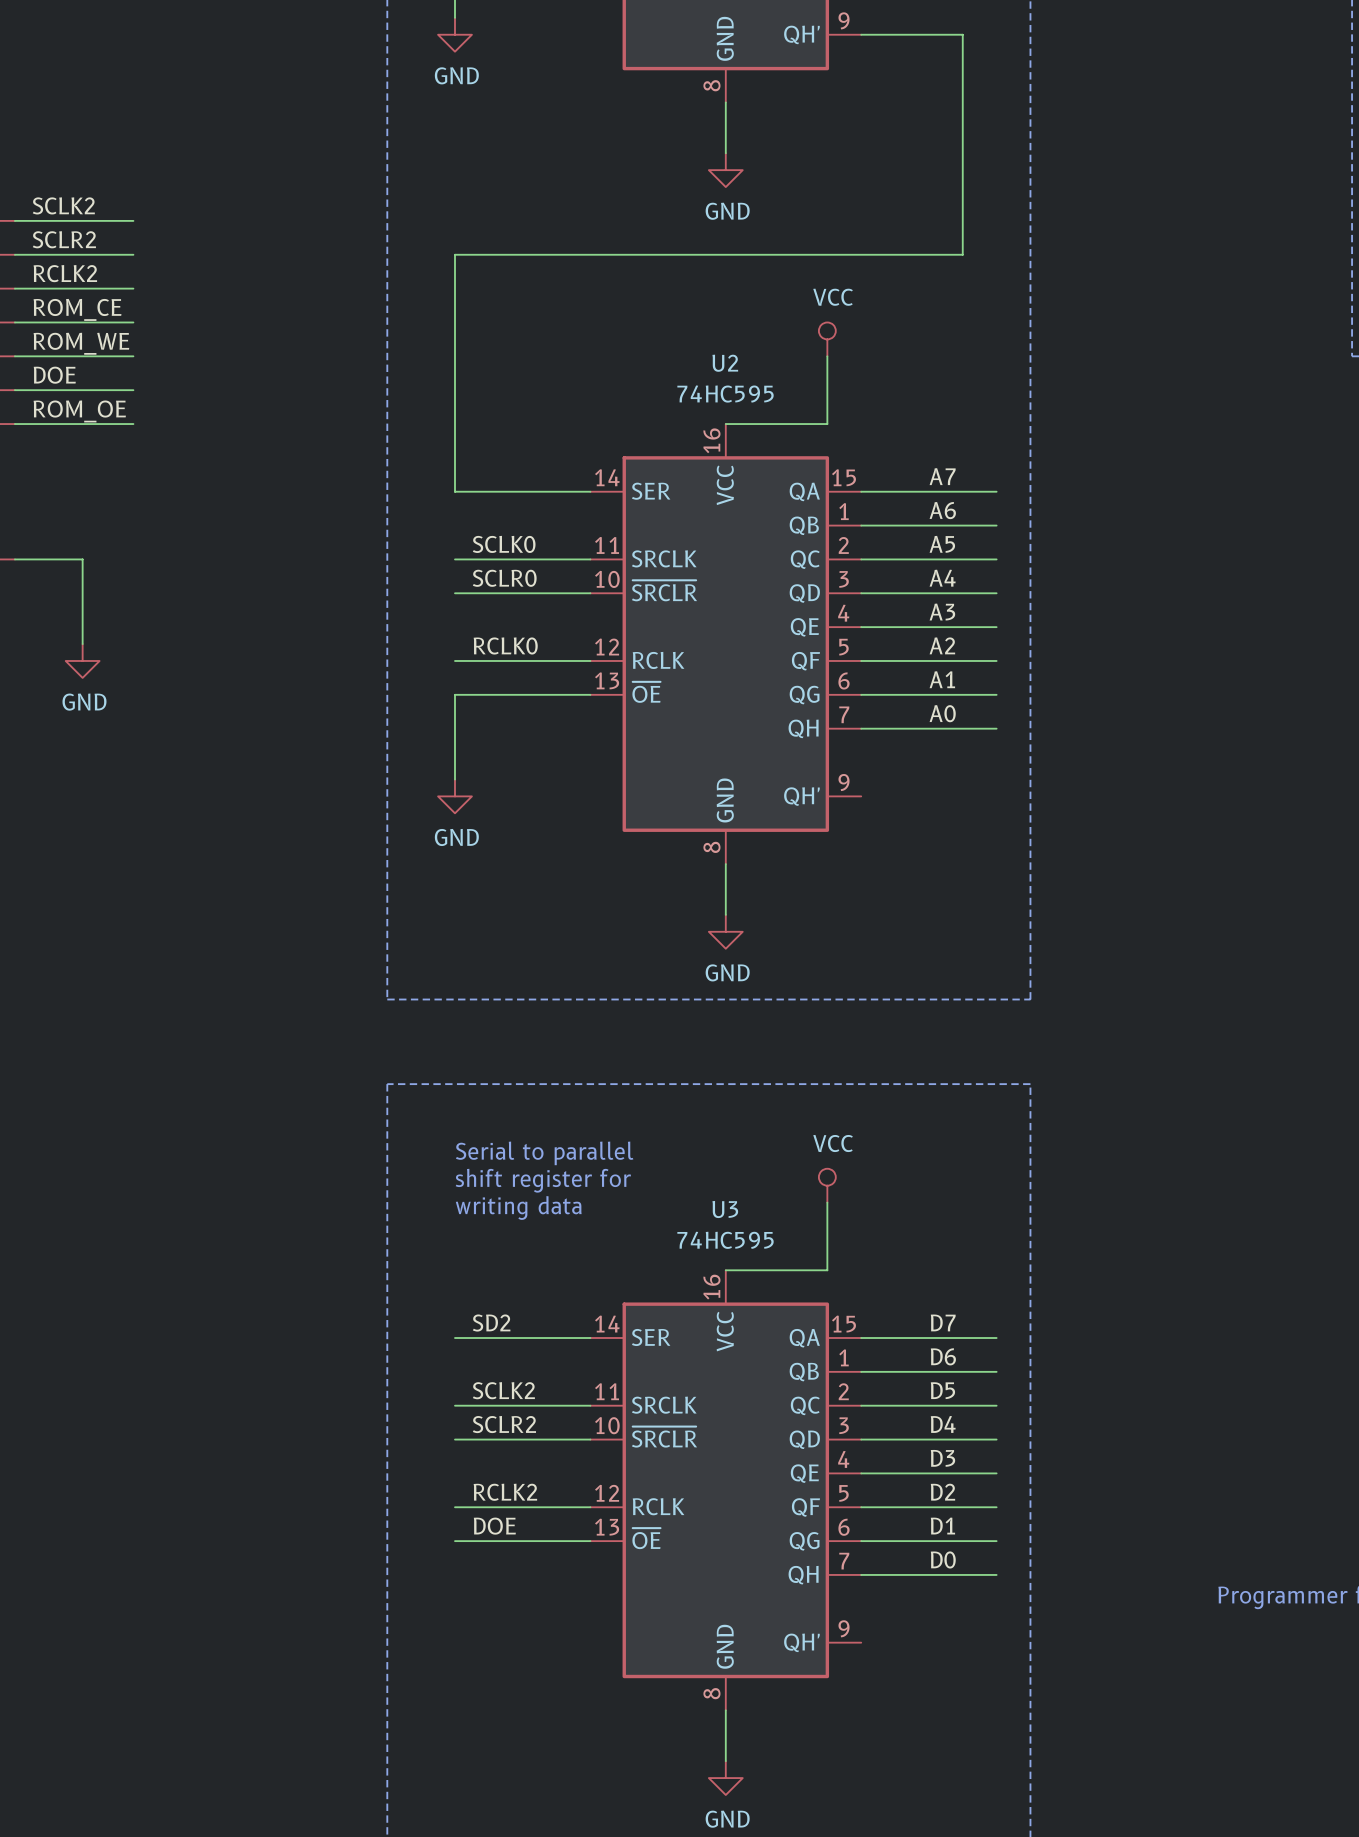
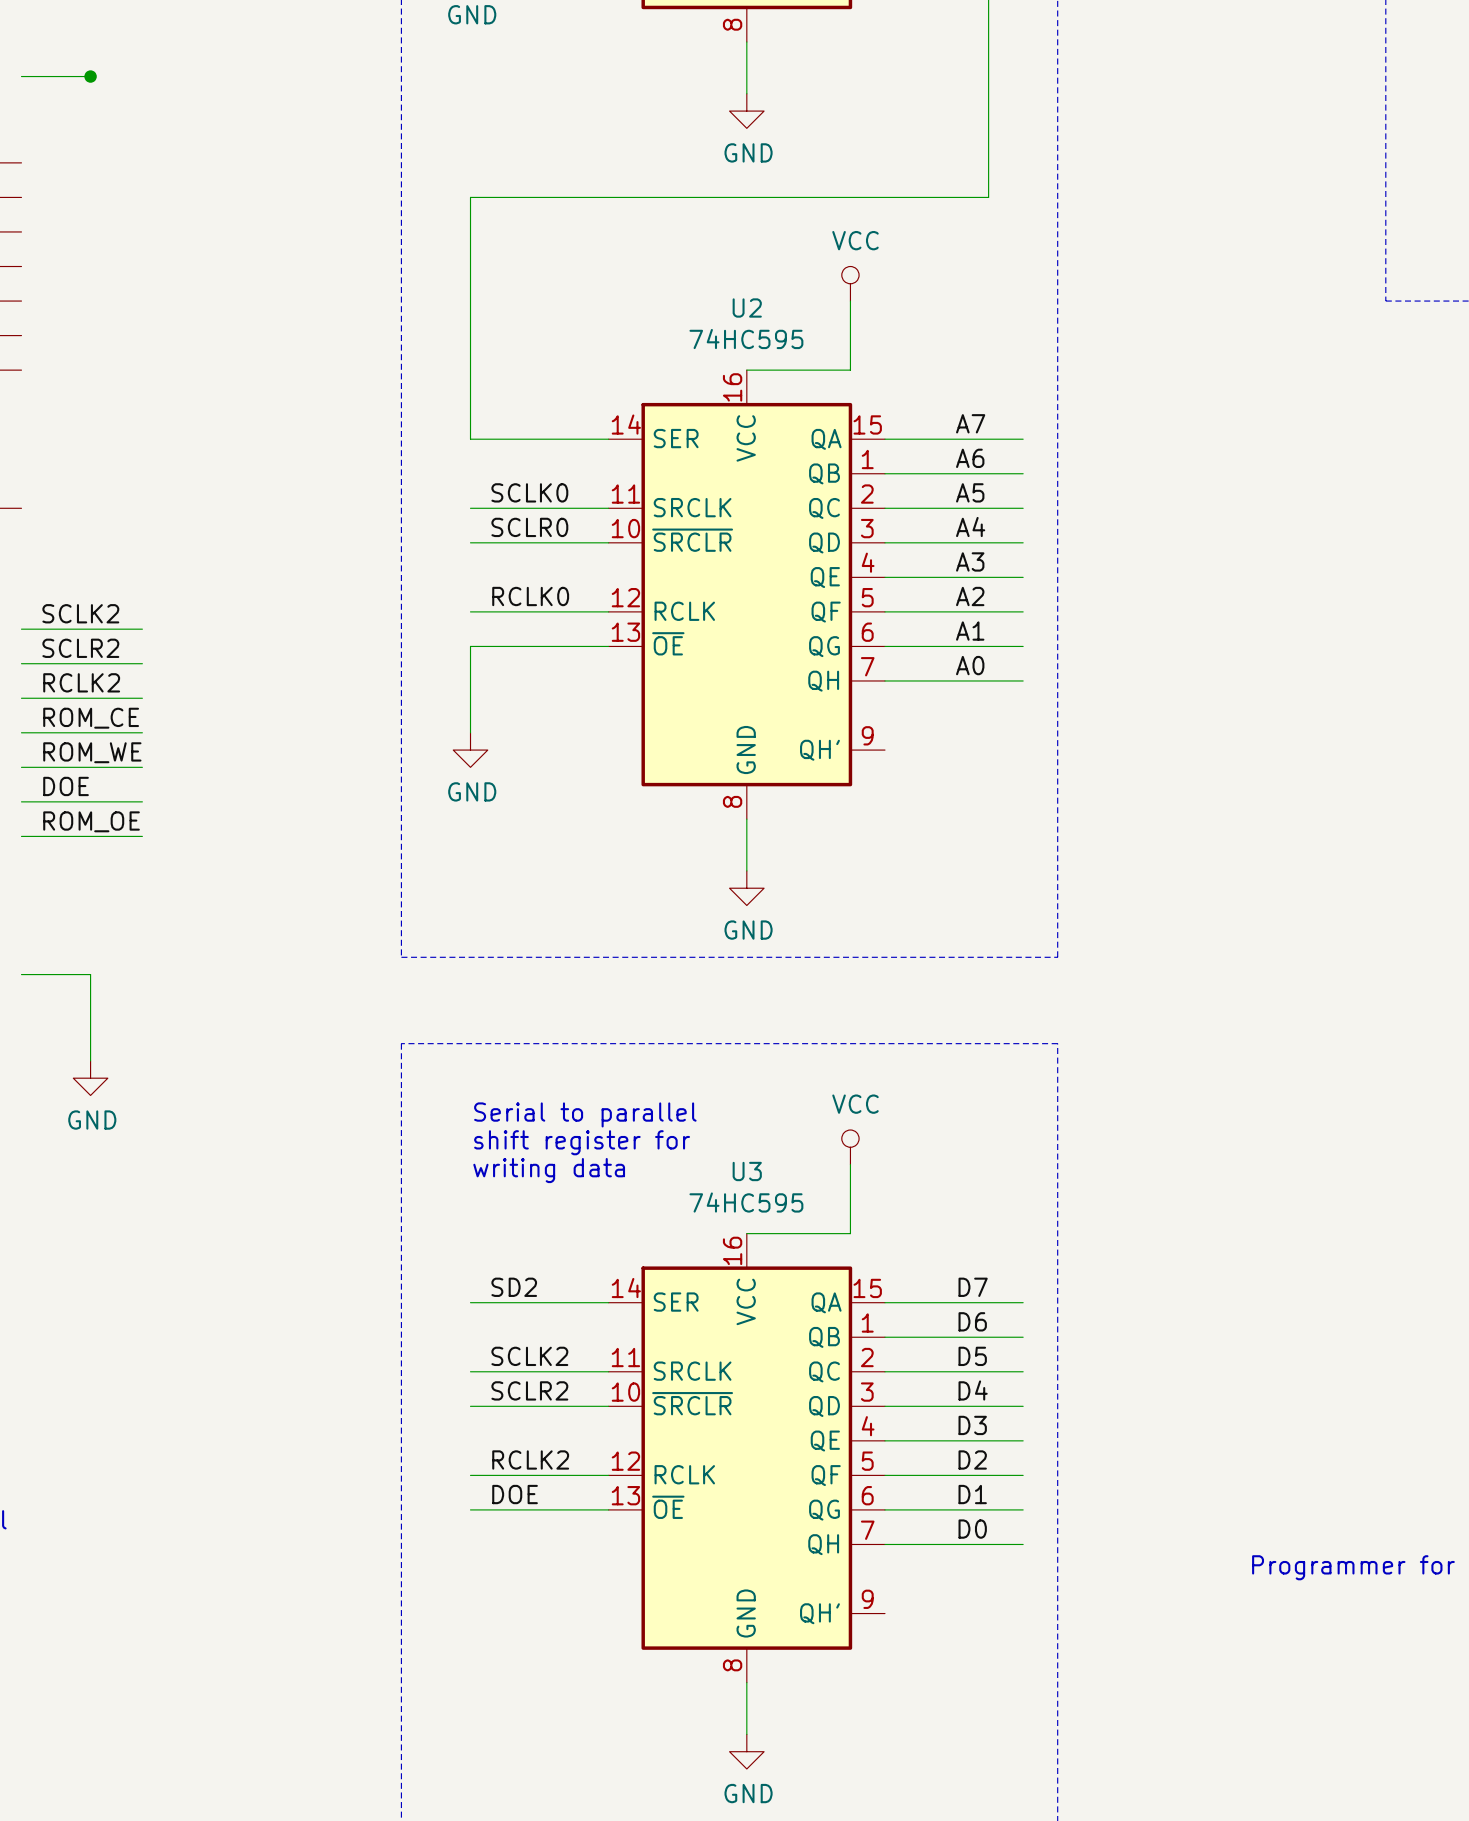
wire: none -> (21, 76) (90, 76)
junction: none -> (90, 76)
label: SCLK2 (63, 205) -> none
wire: (14, 220) (133, 220) -> none
label: SCLR2 (64, 239) -> none
wire: (14, 254) (133, 254) -> none
label: RCLK2 (65, 273) -> none
wire: (14, 288) (133, 288) -> none
label: ROM_CE (77, 309) -> none
wire: (14, 322) (133, 322) -> none
label: ROM_WE (81, 343) -> none
wire: (14, 356) (133, 356) -> (21, 629) (142, 629)
label: DOE (54, 375) -> none
wire: (14, 390) (133, 390) -> (21, 663) (142, 663)
label: ROM_OE (79, 411) -> none
wire: (14, 424) (133, 424) -> (21, 698) (142, 698)
wire: (14, 559) (82, 559) (82, 644) -> none
power symbol: GND (82, 660) -> none
label: none -> SCLK2 (80, 613)
label: none -> SCLR2 (80, 648)
label: none -> RCLK2 (81, 682)
label: none -> ROM_CE (91, 718)
wire: none -> (21, 732) (142, 732)
label: none -> ROM_WE (92, 752)
wire: none -> (21, 767) (142, 767)
label: none -> DOE (66, 786)
wire: none -> (21, 801) (142, 801)
label: none -> ROM_OE (91, 821)
wire: none -> (21, 836) (142, 836)
wire: none -> (21, 974) (90, 974) (90, 1060)
power symbol: none -> GND (90, 1078)

